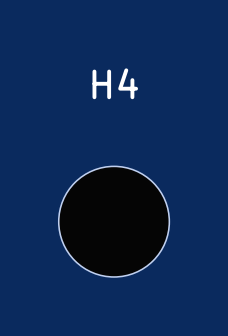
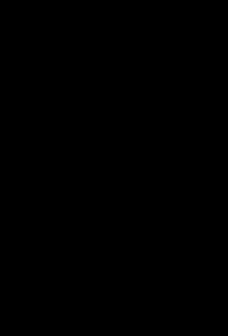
H4: (114, 221) -> none

